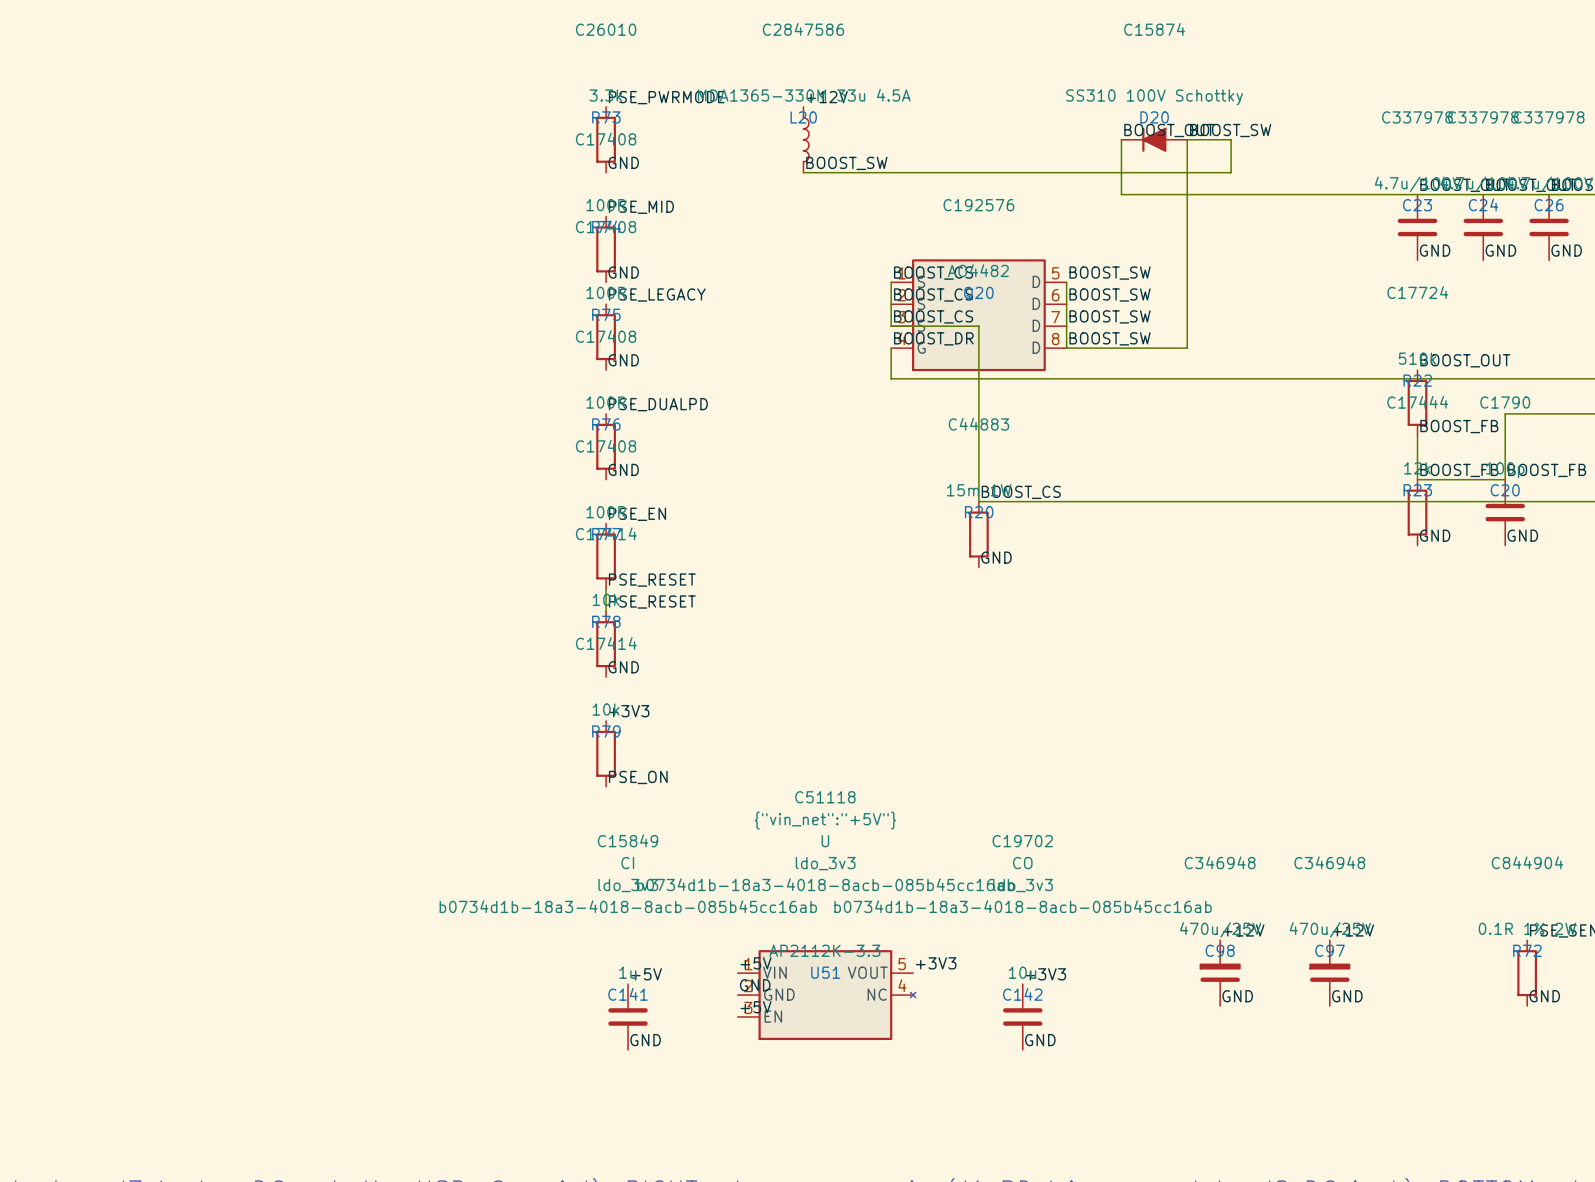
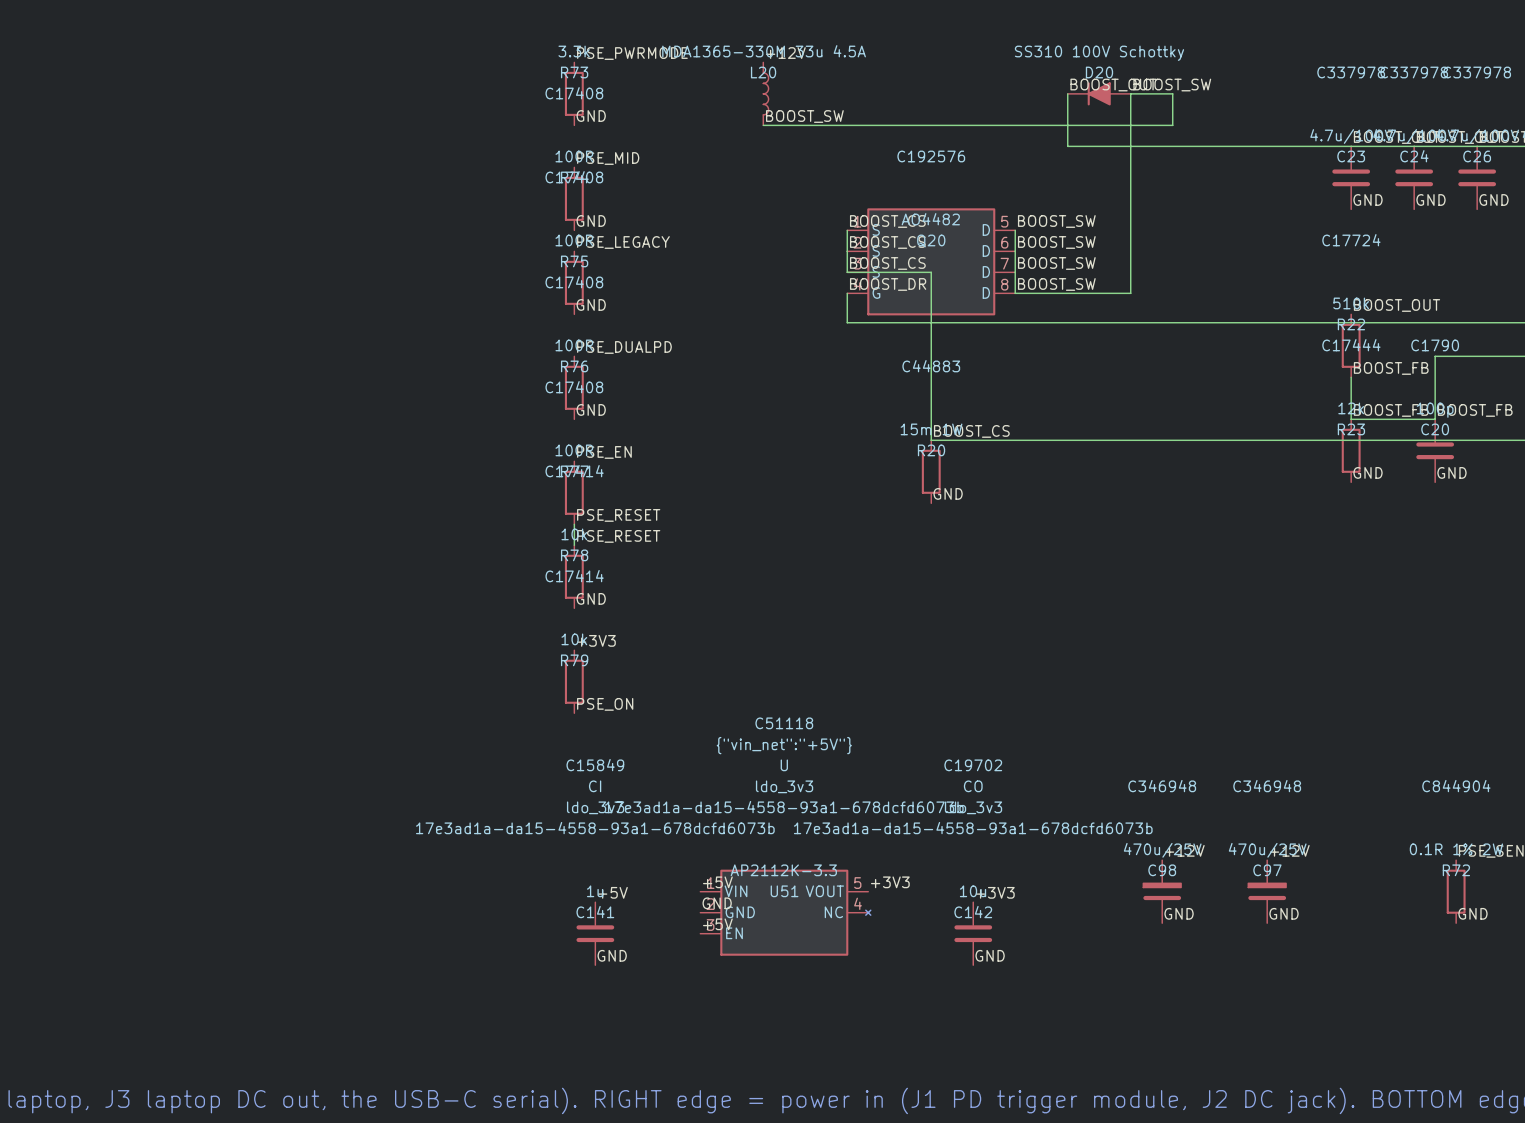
U51 text: b0734d1b-18a3-4018-8acb-085b45cc16ab (825, 884) -> 17e3ad1a-da15-4558-93a1-678dcfd6073b (784, 807)
C141 text: b0734d1b-18a3-4018-8acb-085b45cc16ab (628, 906) -> 17e3ad1a-da15-4558-93a1-678dcfd6073b (595, 828)
C142 text: b0734d1b-18a3-4018-8acb-085b45cc16ab (1023, 906) -> 17e3ad1a-da15-4558-93a1-678dcfd6073b (973, 828)

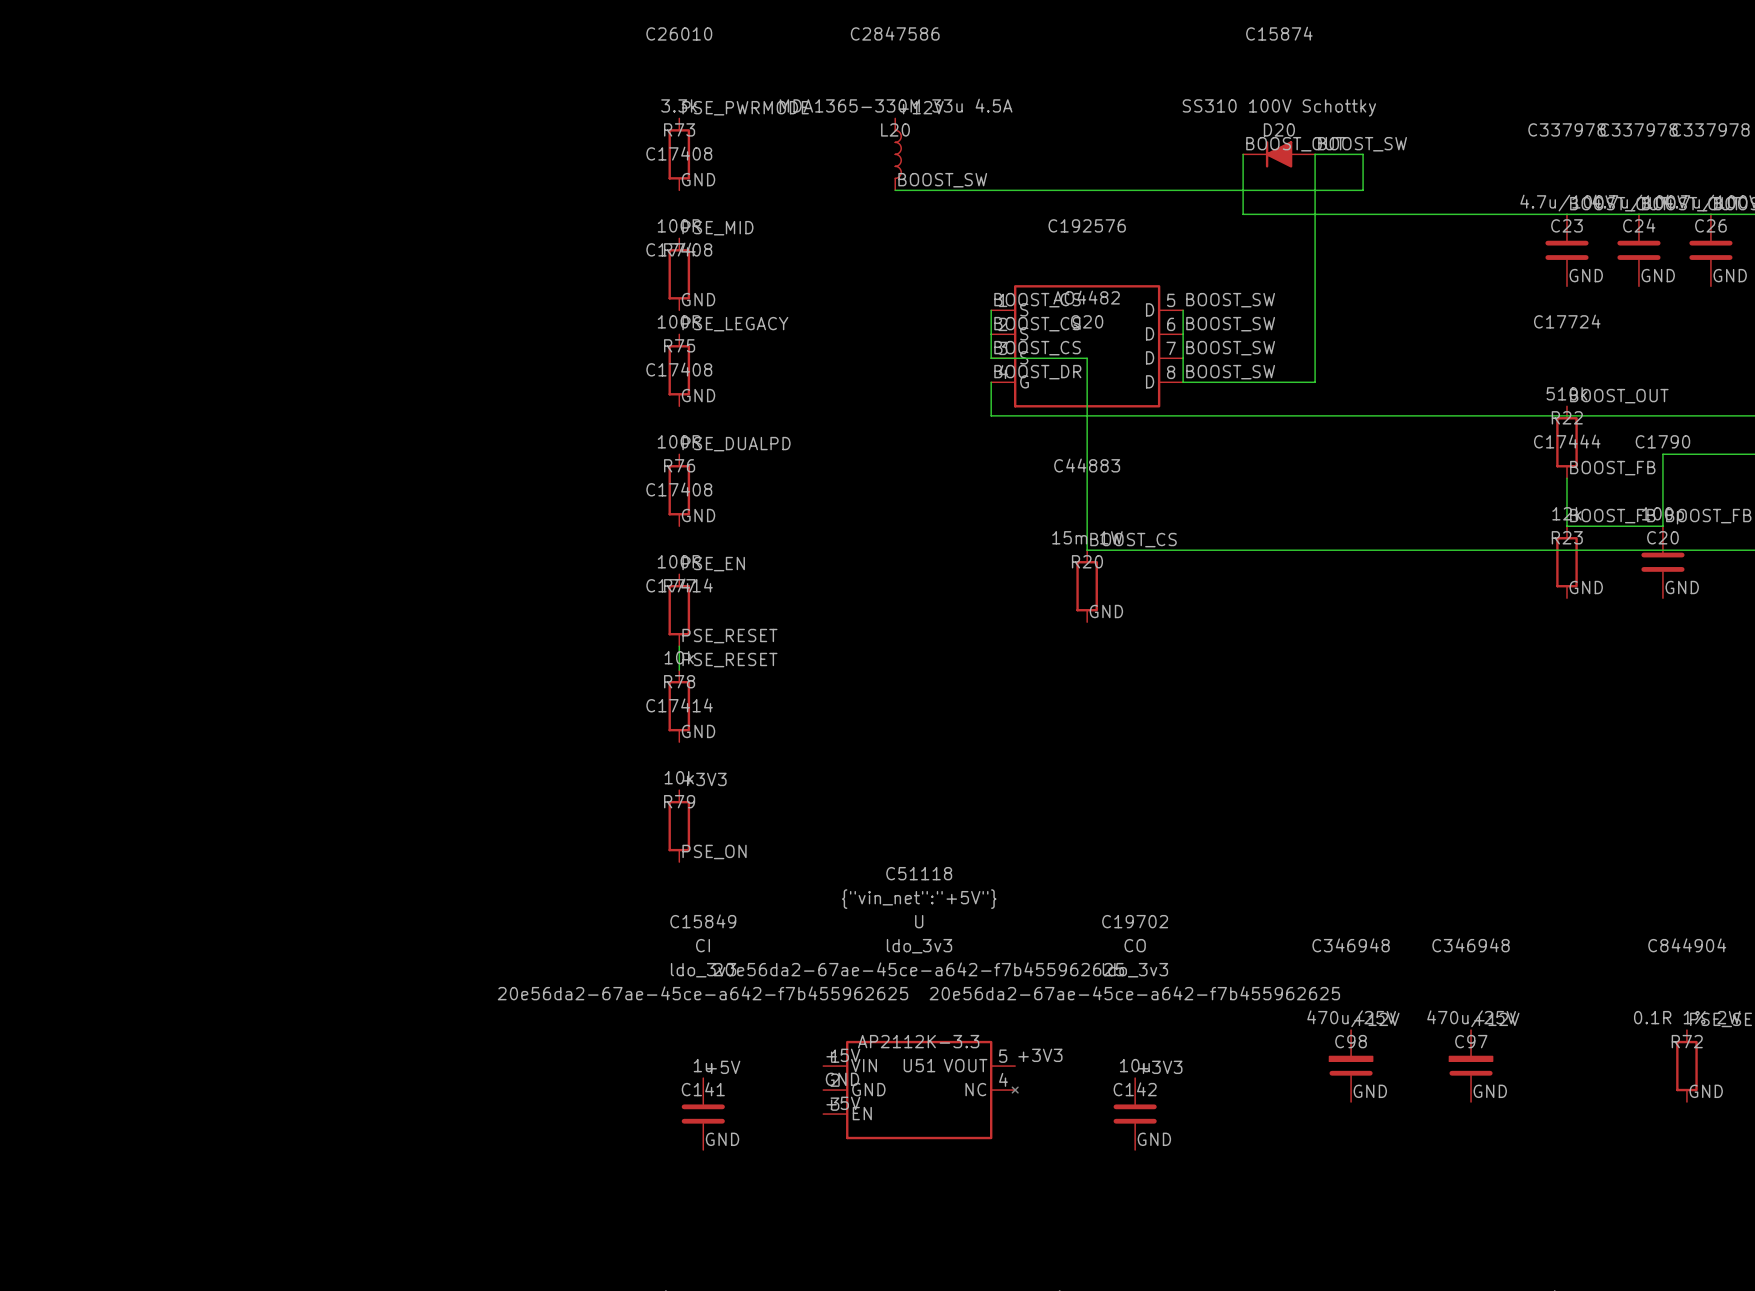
U51 text: 17e3ad1a-da15-4558-93a1-678dcfd6073b (784, 807) -> 20e56da2-67ae-45ce-a642-f7b455962625 (918, 969)
C141 text: 17e3ad1a-da15-4558-93a1-678dcfd6073b (595, 828) -> 20e56da2-67ae-45ce-a642-f7b455962625 (703, 993)
C142 text: 17e3ad1a-da15-4558-93a1-678dcfd6073b (973, 828) -> 20e56da2-67ae-45ce-a642-f7b455962625 (1134, 993)

